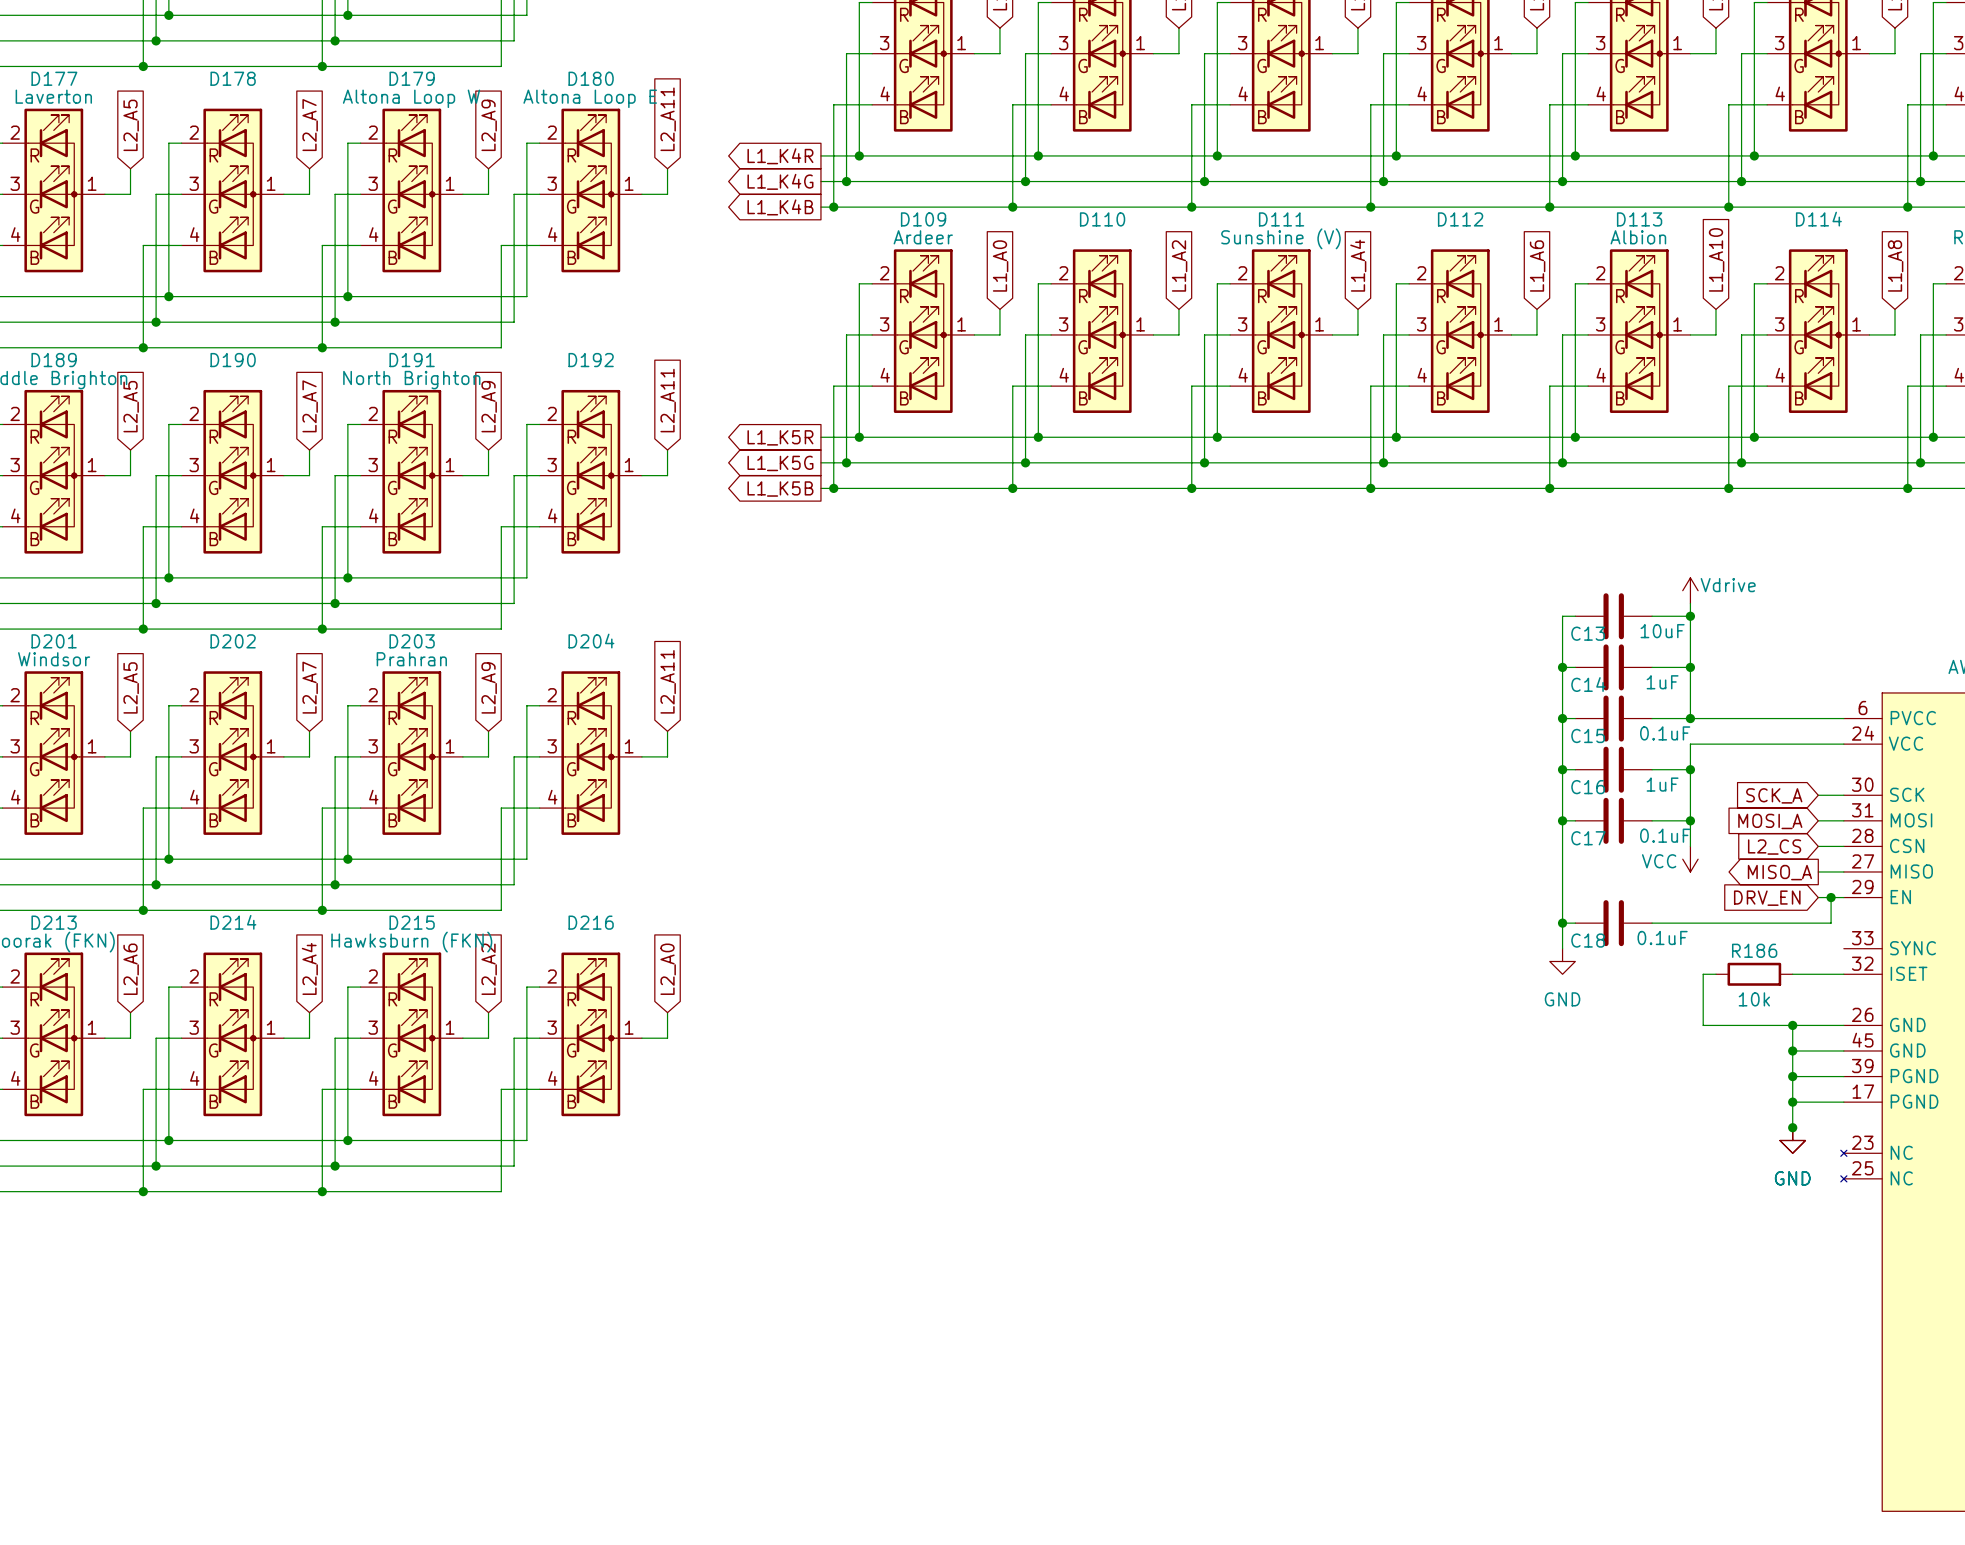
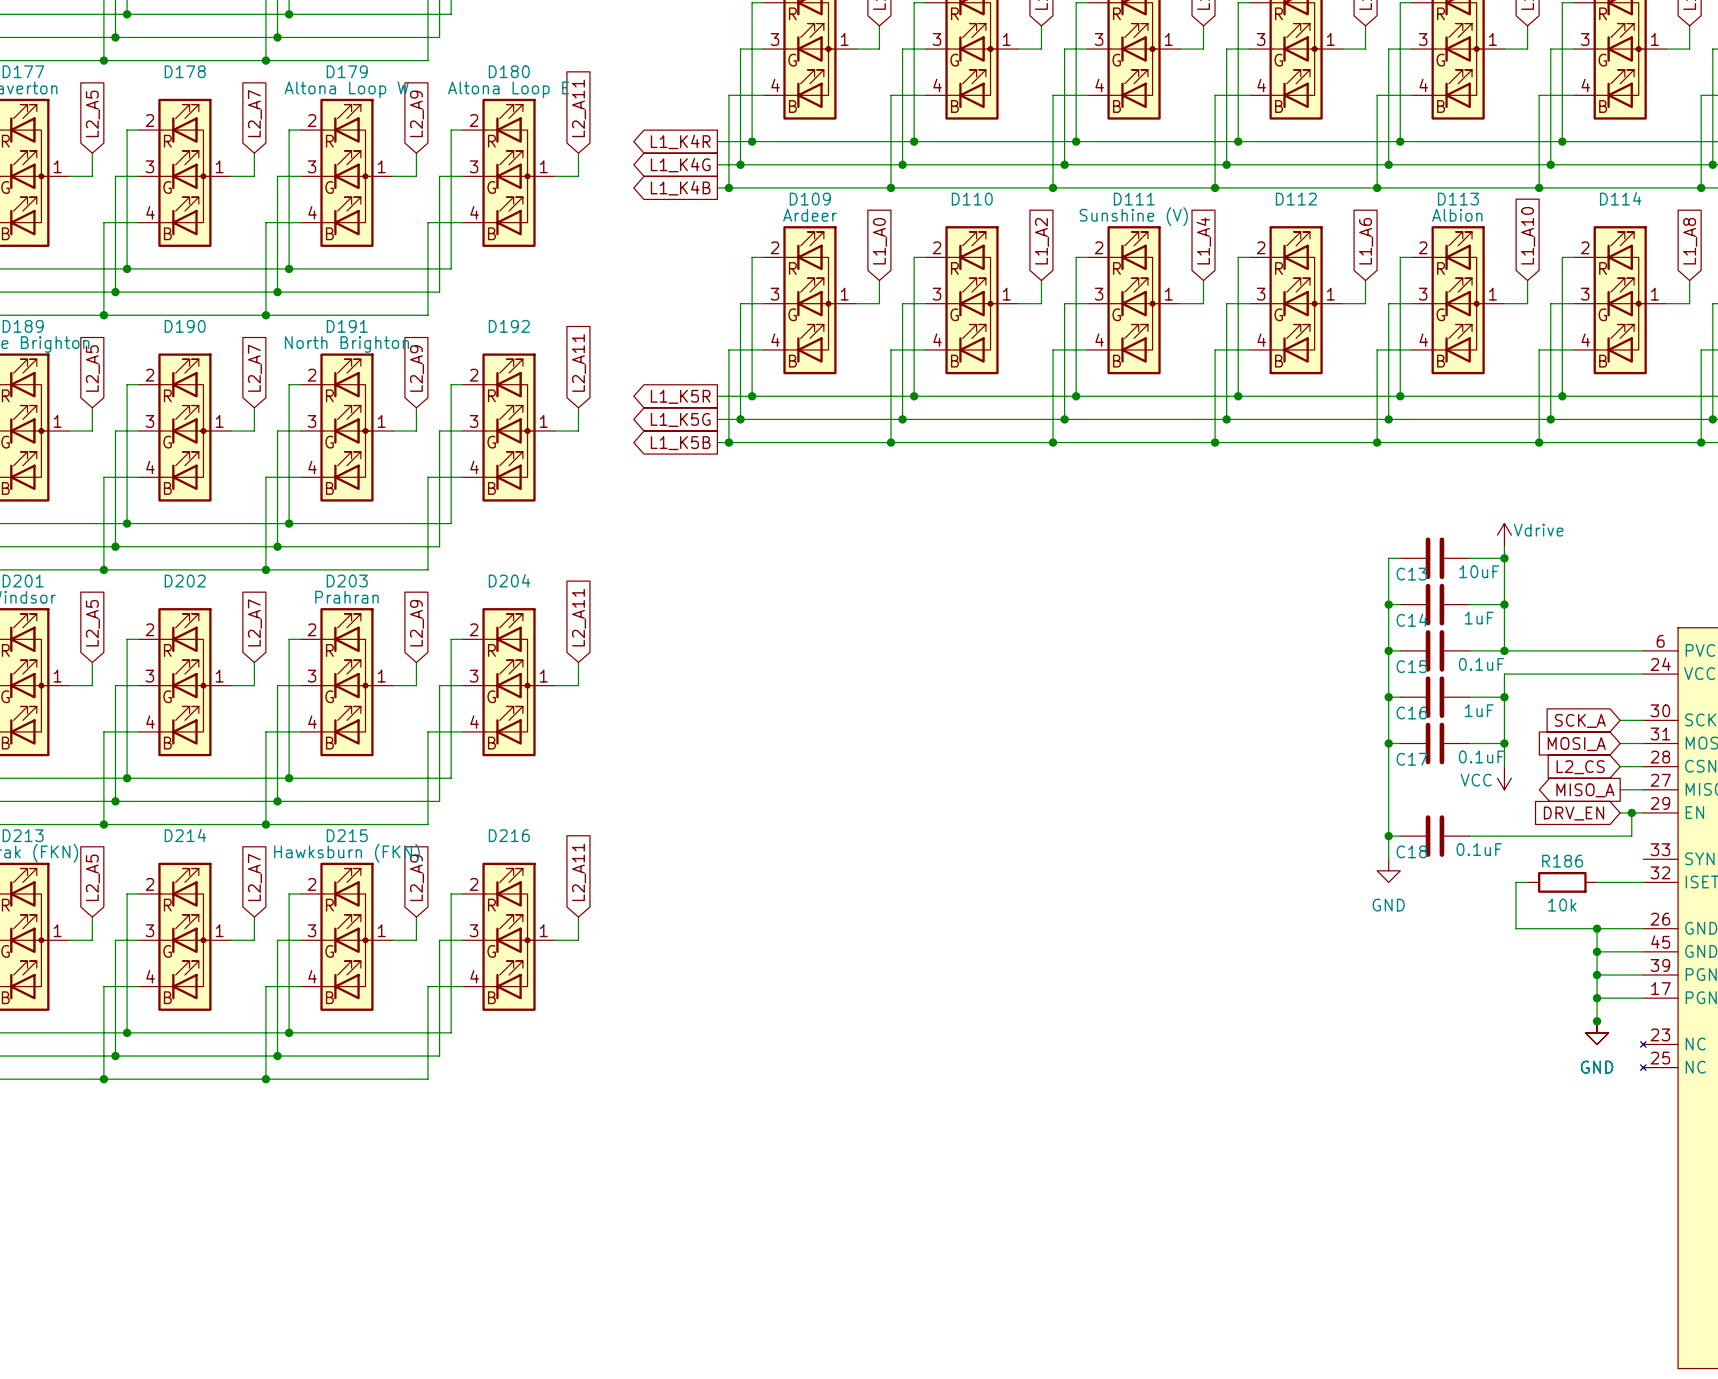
global label: L2_A4 (309, 968) -> L2_A7 (254, 877)
global label: L2_A6 (131, 969) -> L2_A5 (92, 877)
global label: L2_A2 (489, 969) -> L2_A9 (416, 877)
global label: L2_A0 (668, 969) -> L2_A11 (579, 872)

